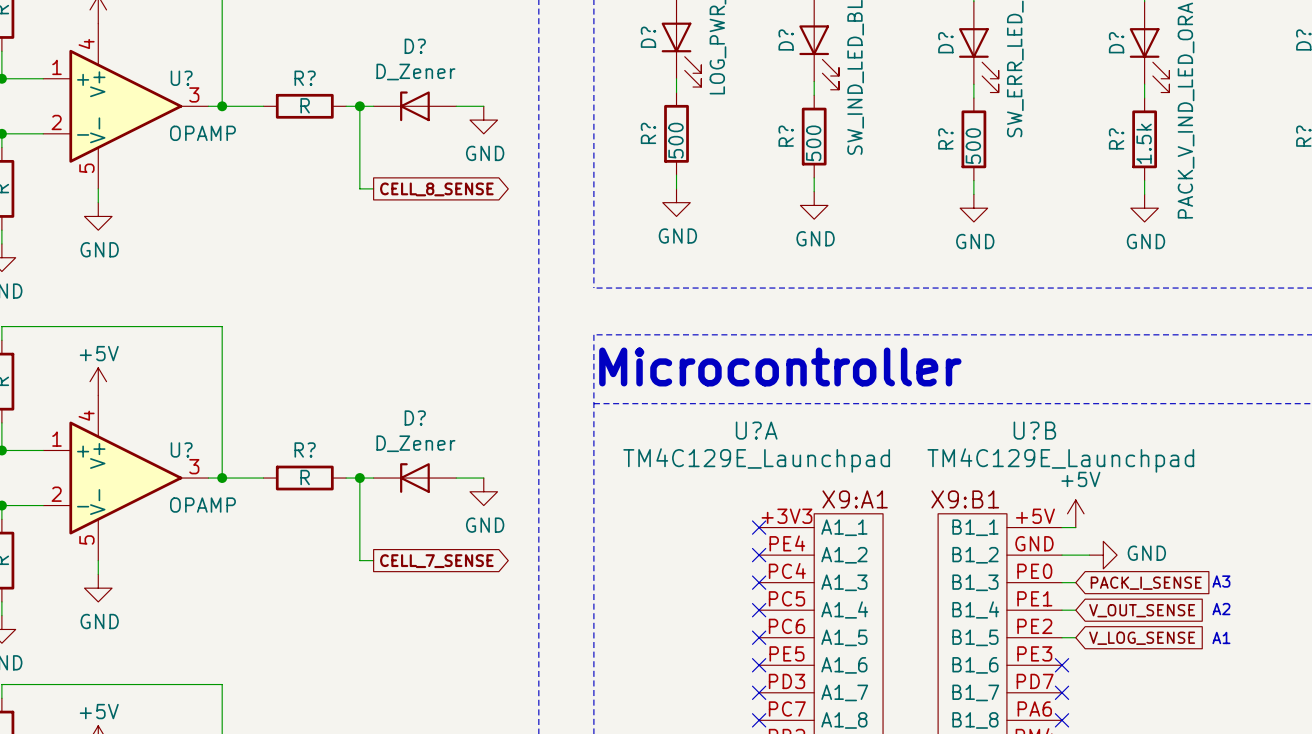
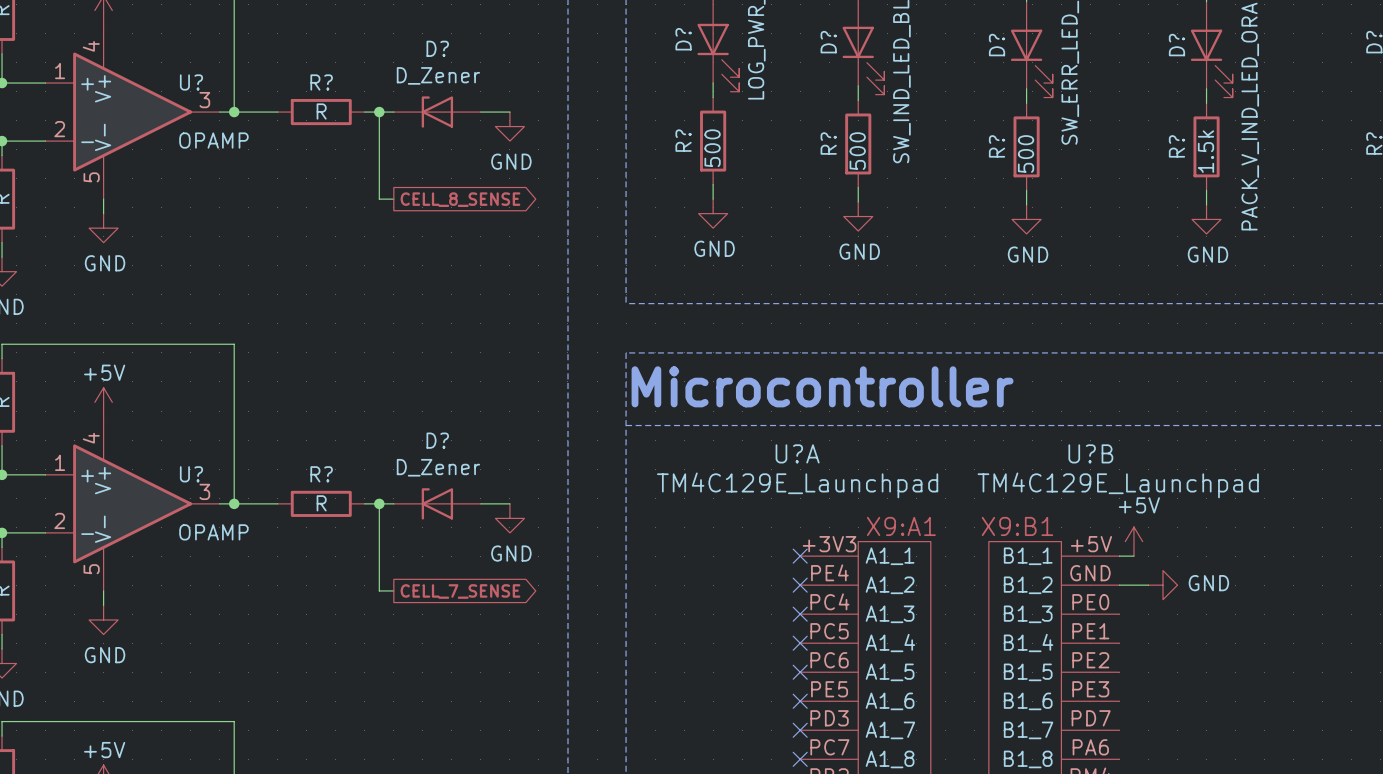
text: A3 (1221, 581) -> none
wire: (1062, 582) (1075, 582) -> none
global label: PACK_I_SENSE (1146, 583) -> none
text: A2 (1221, 609) -> none
wire: (1062, 610) (1075, 610) -> none
global label: V_OUT_SENSE (1142, 610) -> none
wire: (1062, 637) (1075, 637) -> none
text: A1 (1221, 637) -> none
global label: V_LOG_SENSE (1142, 638) -> none
no-connect mark: (1062, 665) -> none
no-connect mark: (1062, 692) -> none
no-connect mark: (1062, 720) -> none

